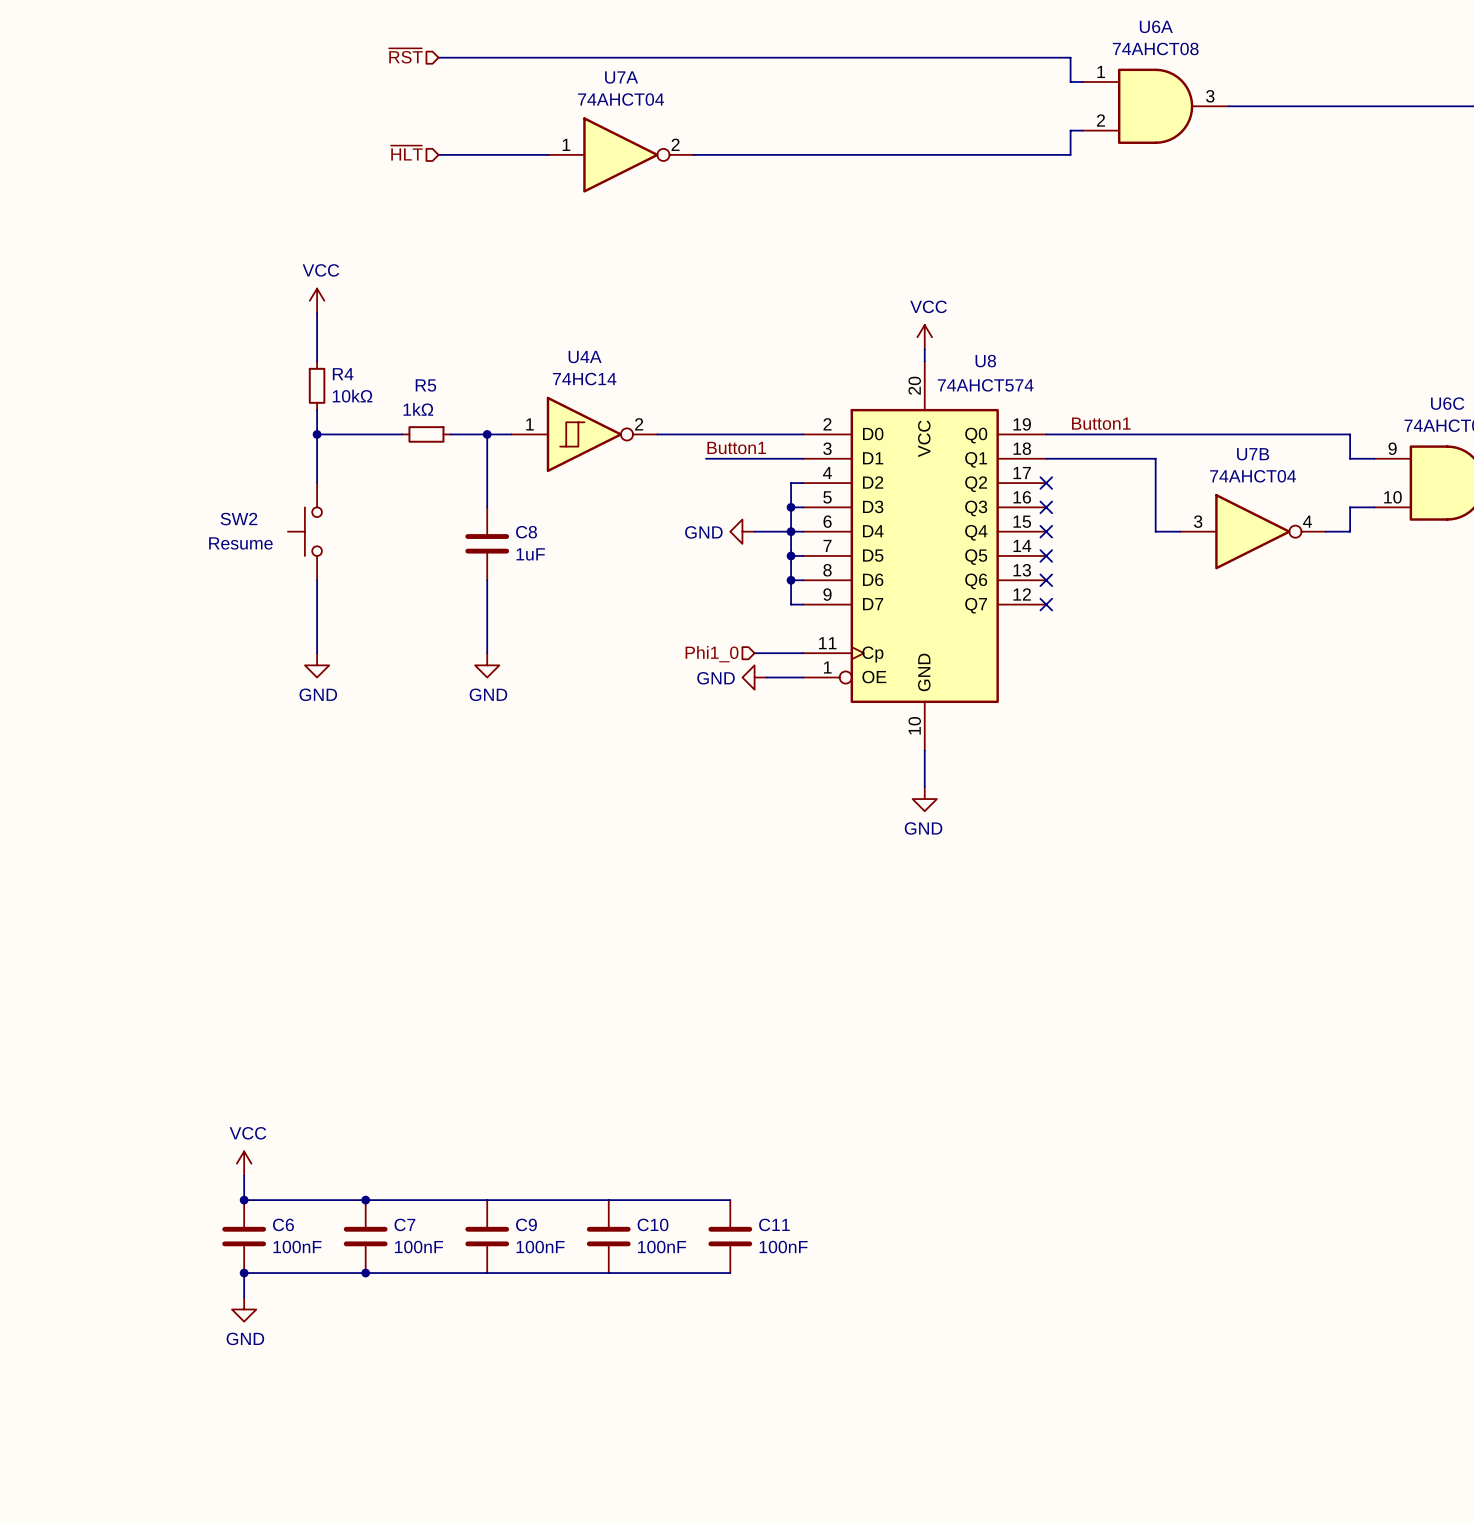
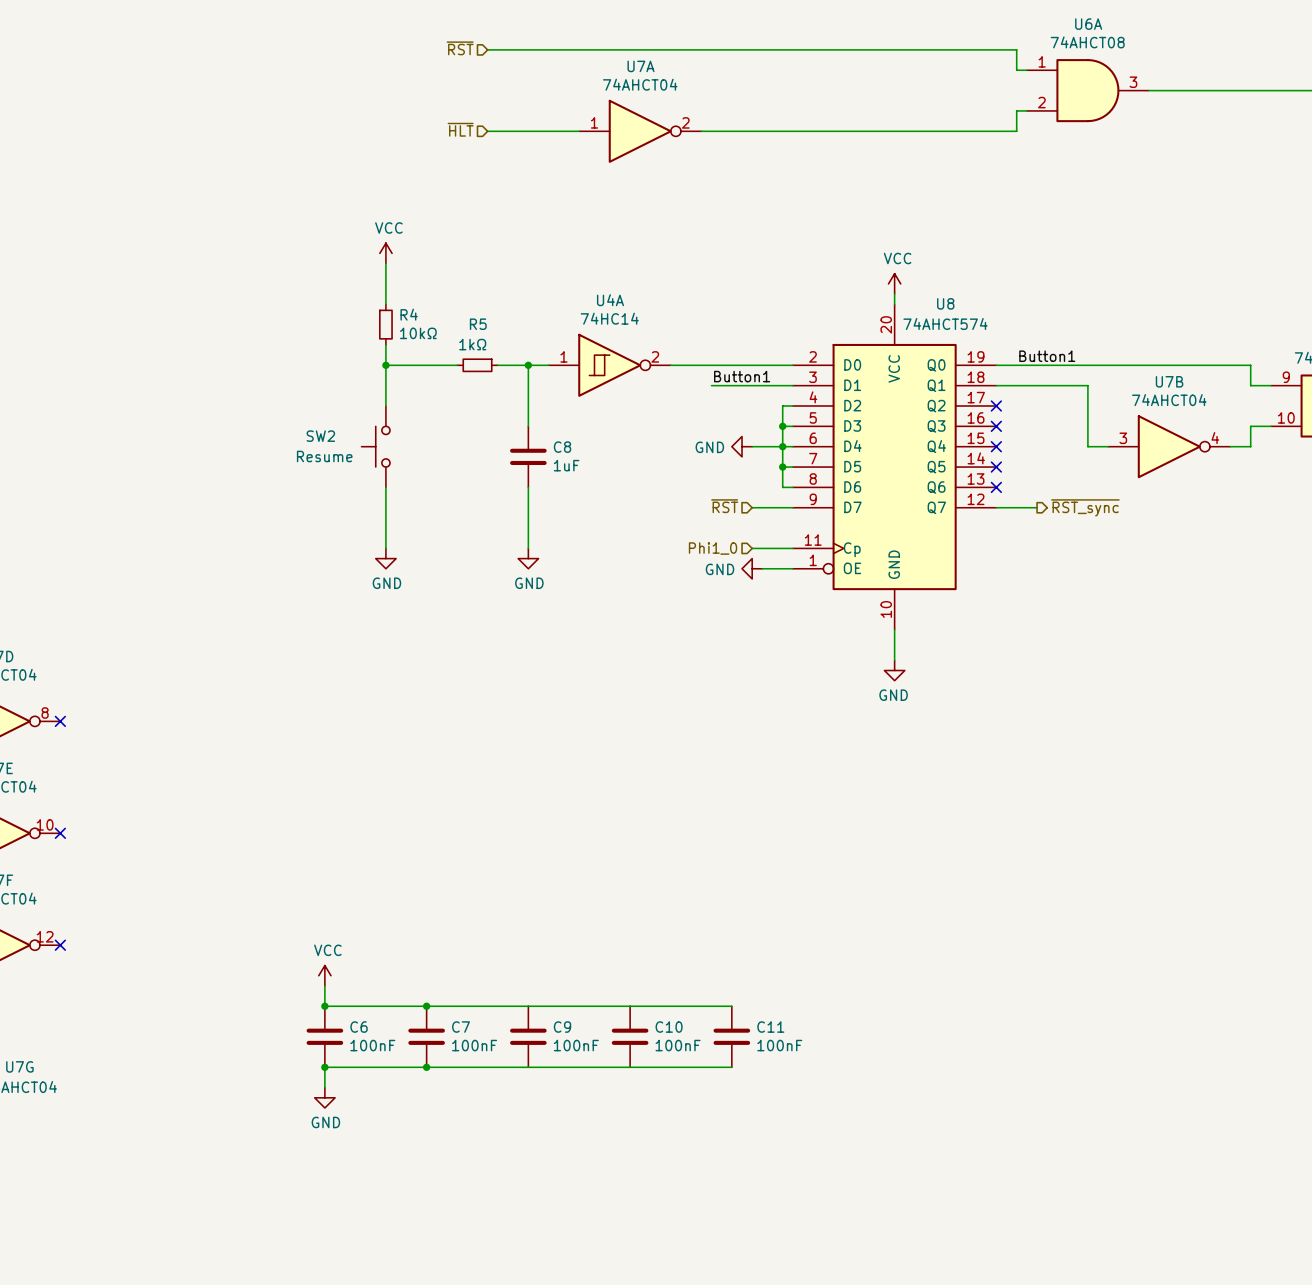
wire: (791, 580) (791, 604) -> (752, 507) (782, 507)
junction: (791, 580) -> none
hierarchical label: none -> ~{RST} (724, 506)
wire: none -> (996, 507) (1037, 507)
no-connect mark: (1046, 604) -> none
hierarchical label: none -> ~{RST_sync} (1085, 507)

